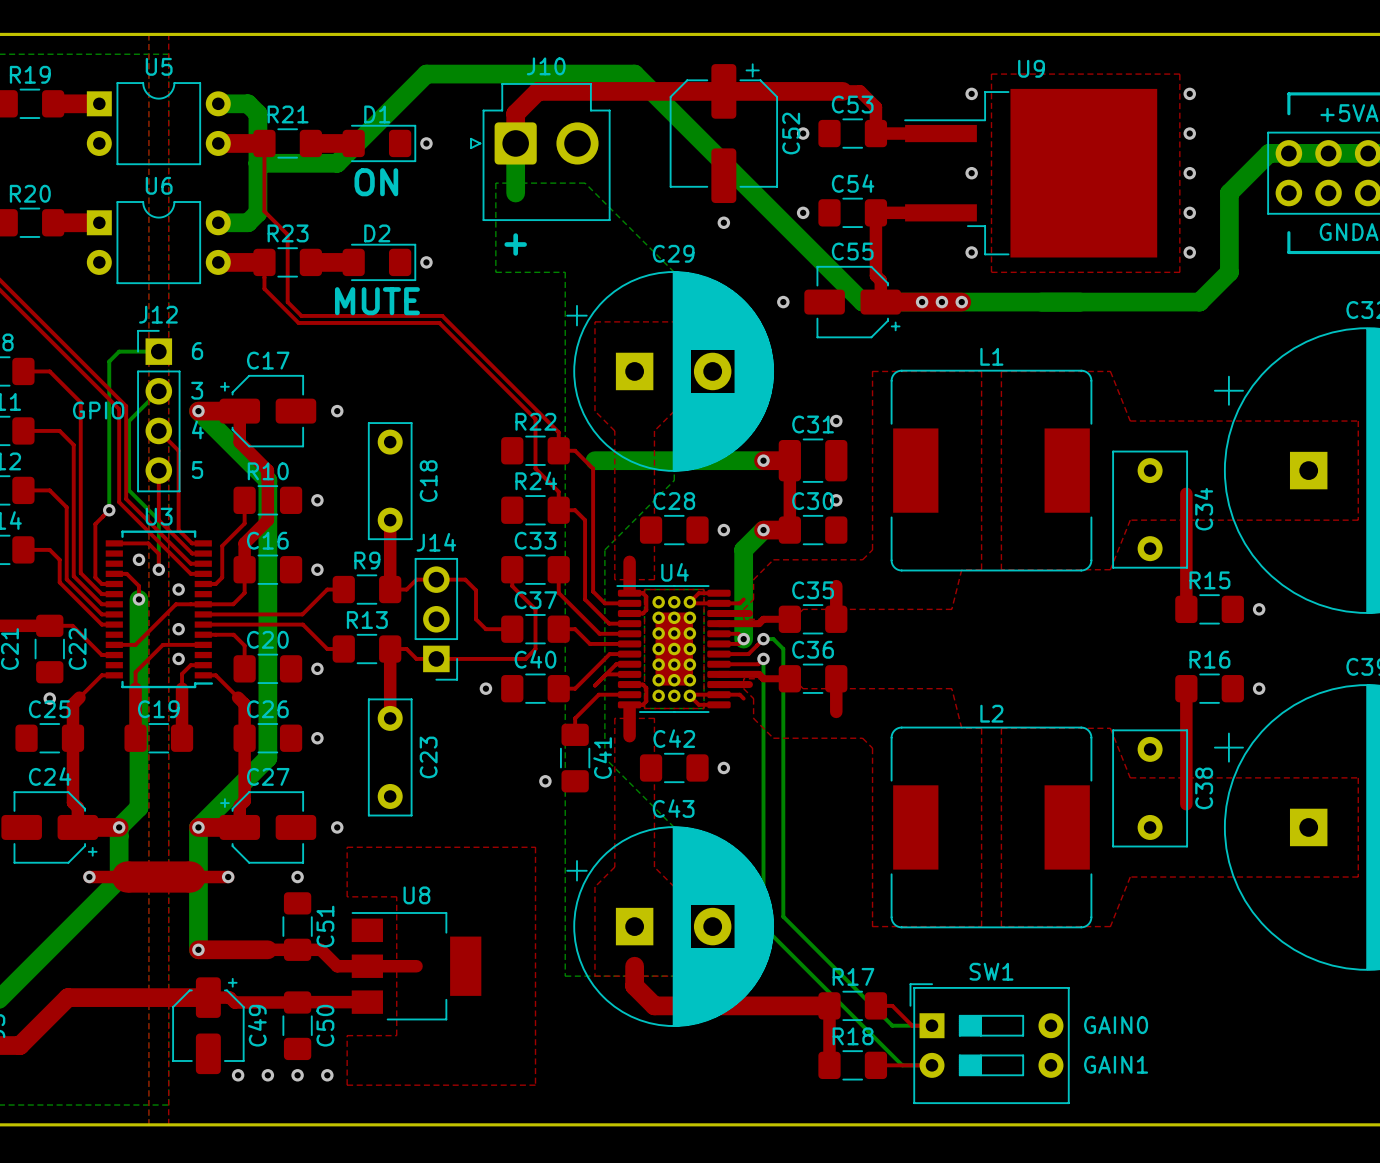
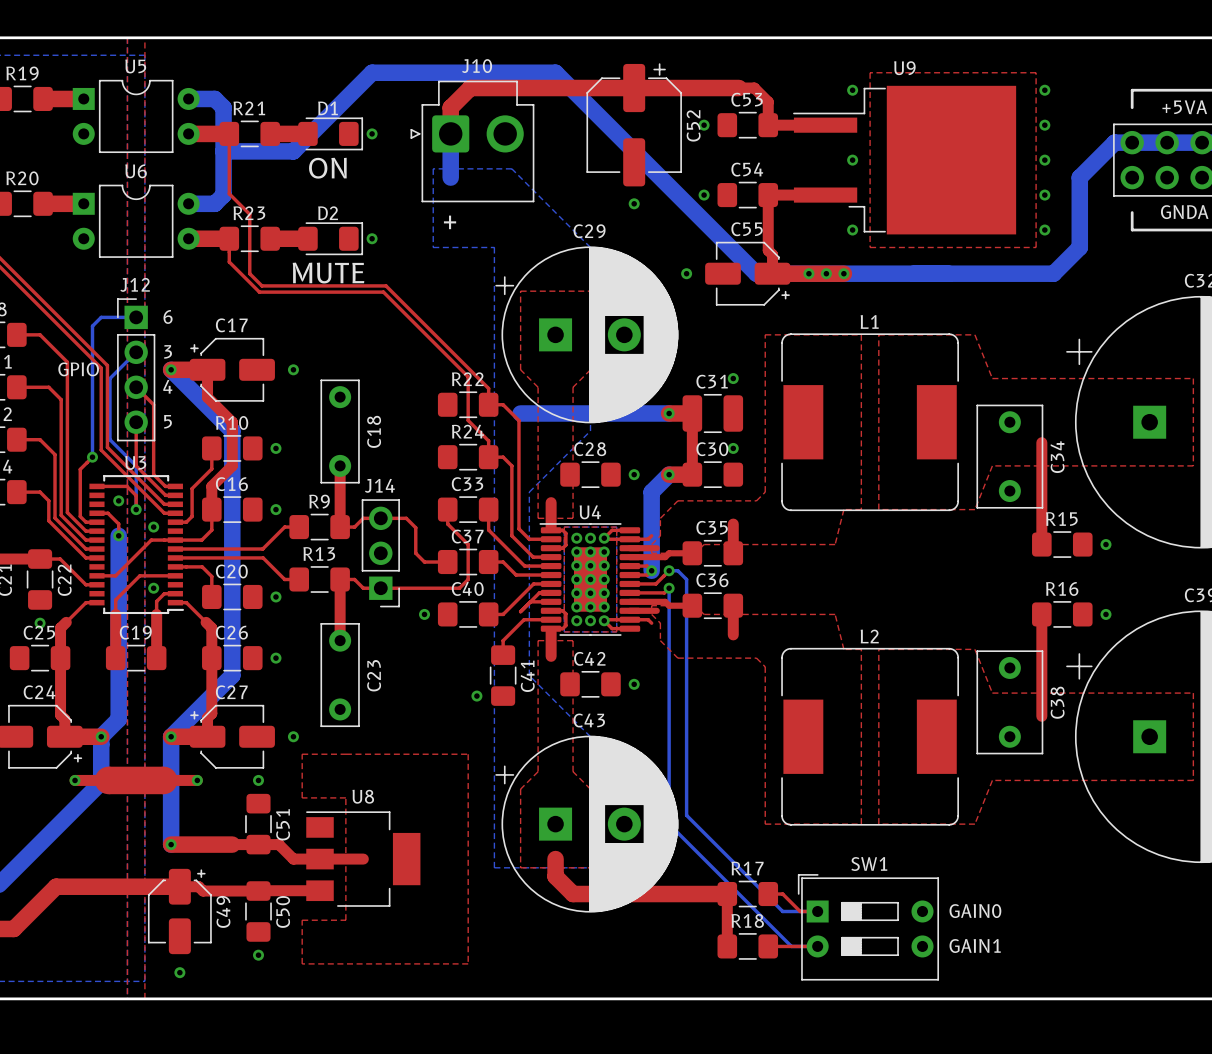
via: (178, 629) -> none
via: (238, 1075) -> none
via: (267, 1075) -> none
via: (327, 1075) -> none
via: none -> (179, 972)

